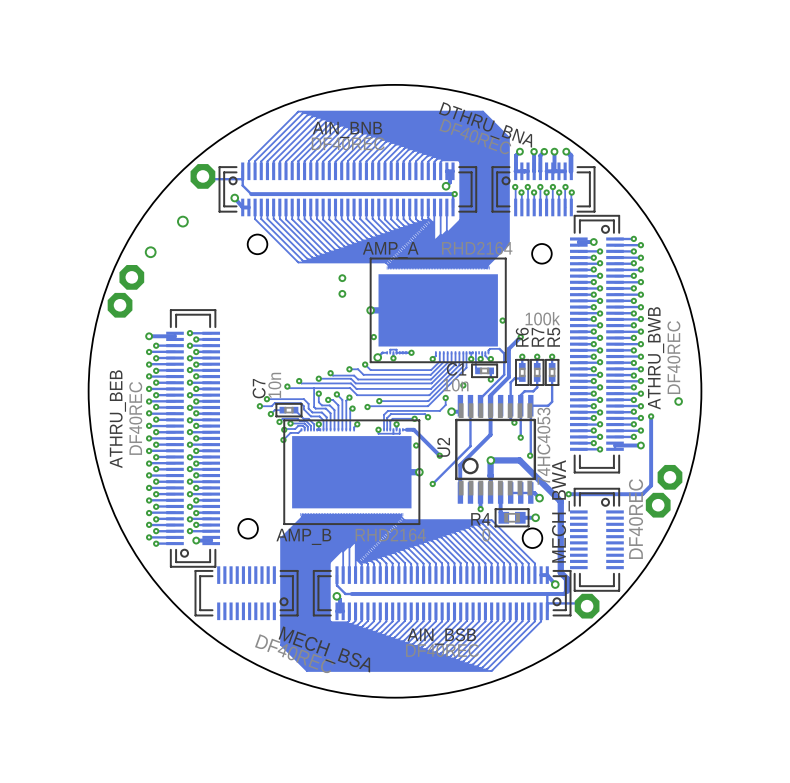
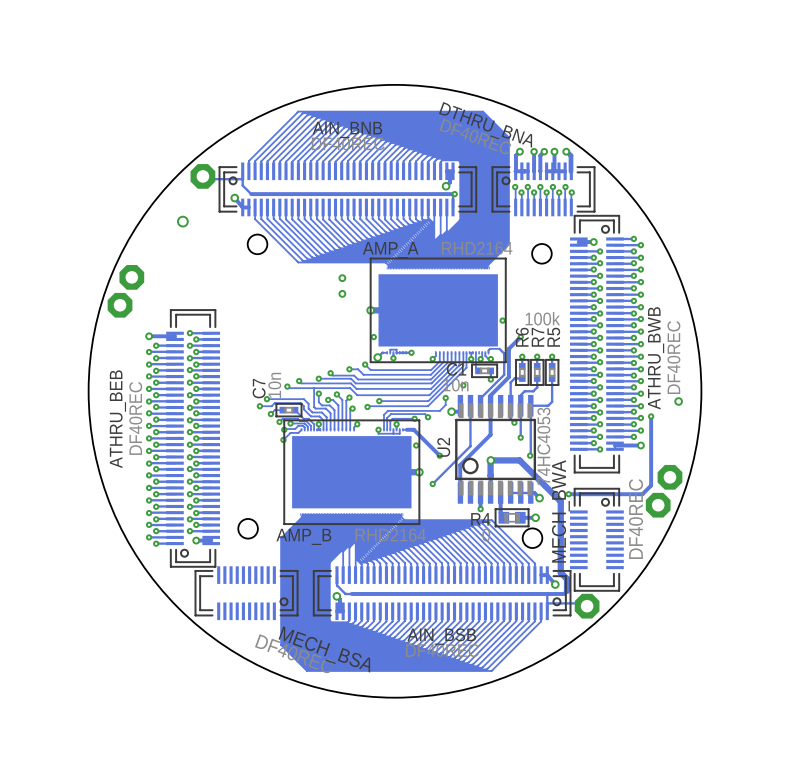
via: (150, 252) -> none

